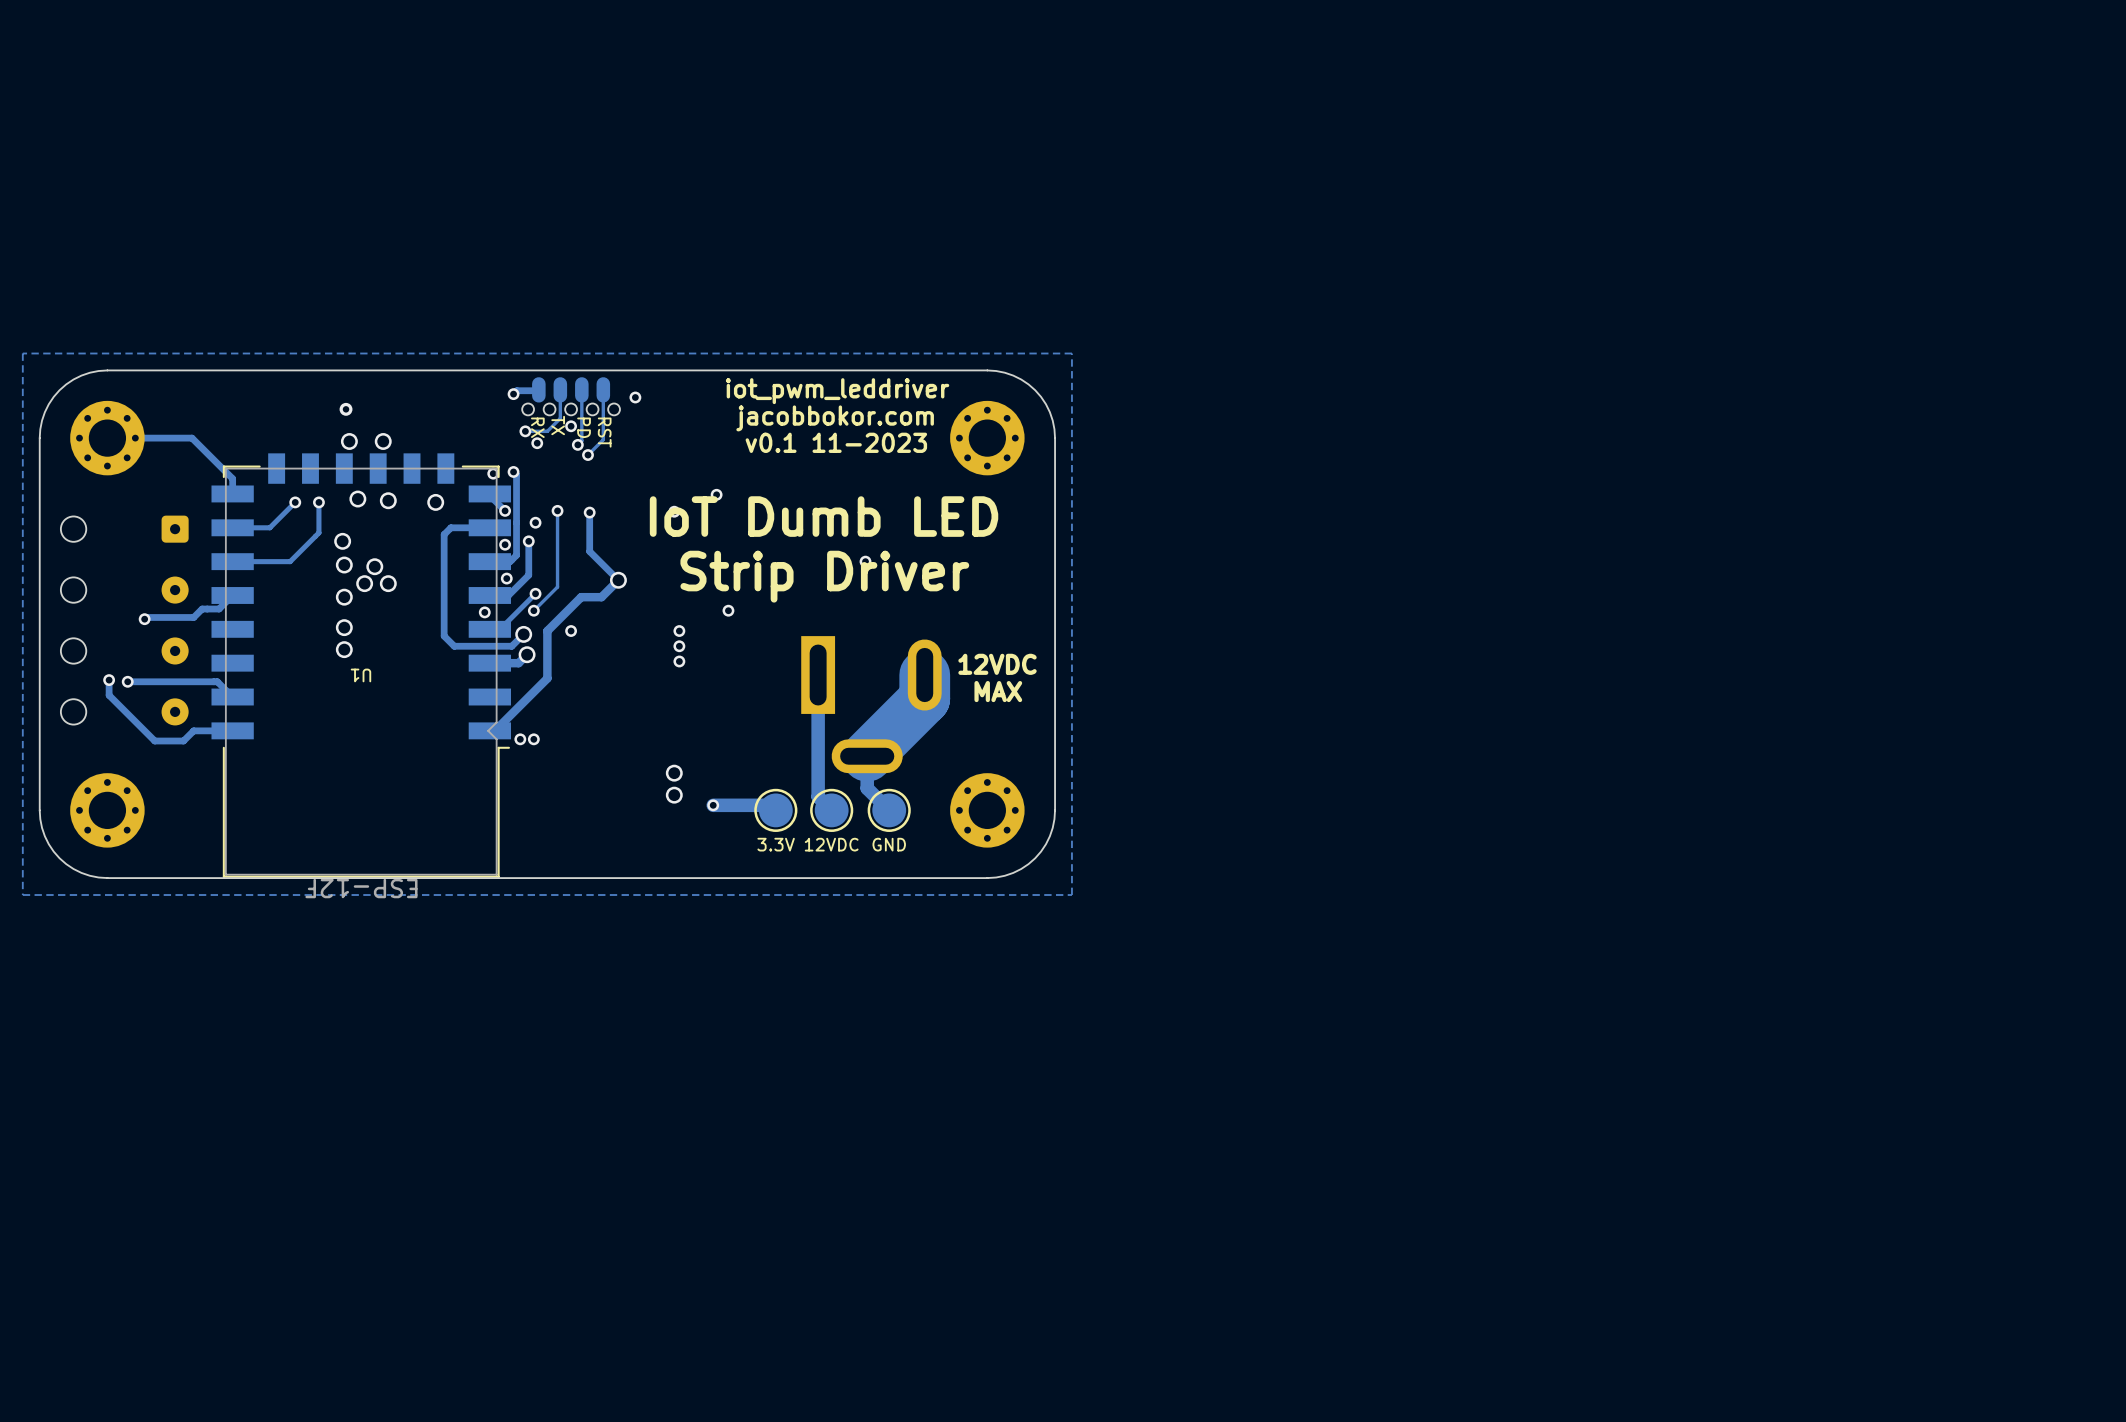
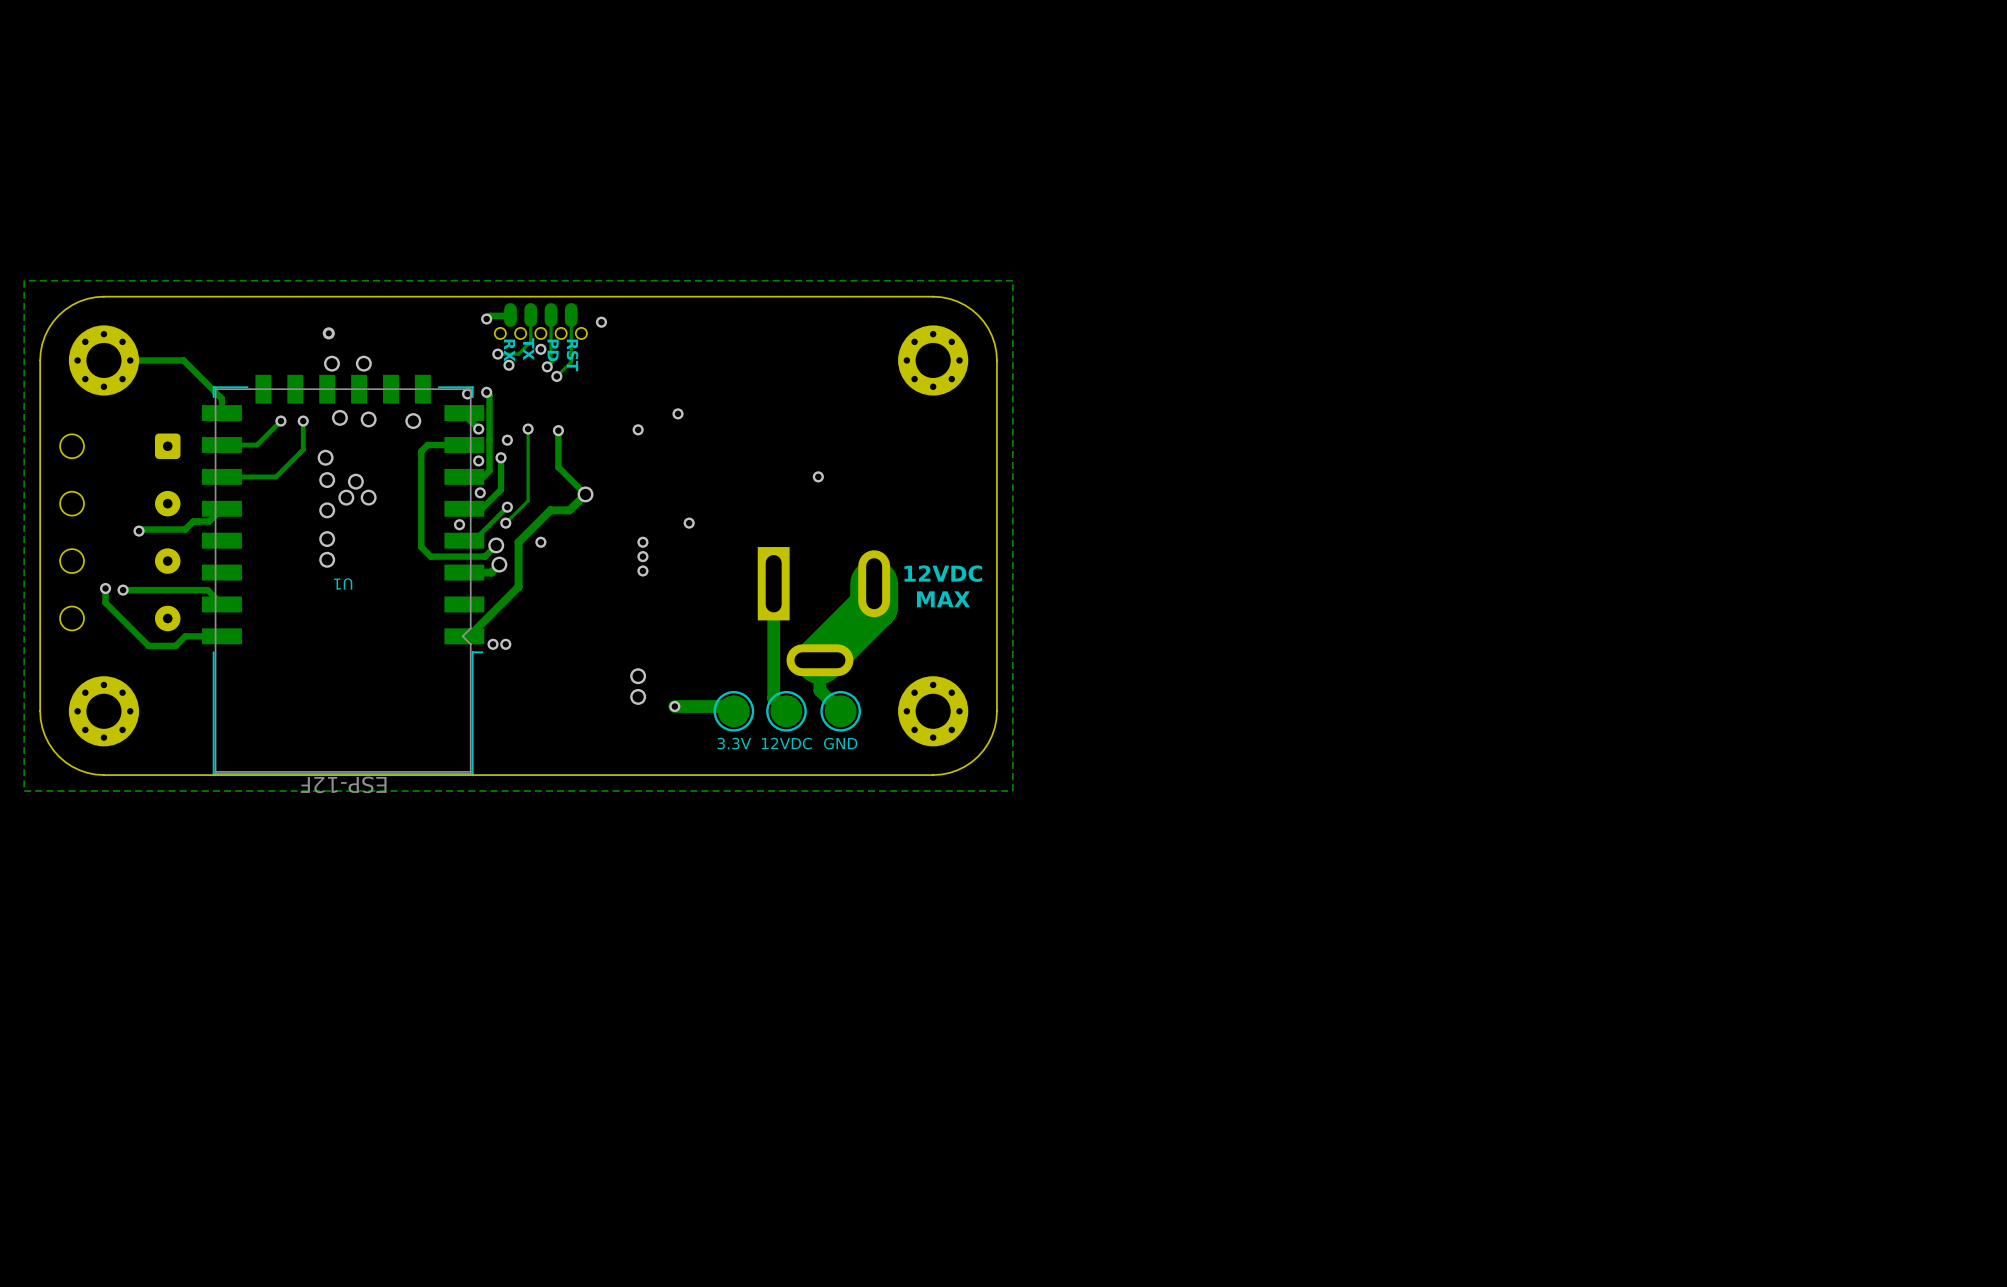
text: iot_pwm_leddriver (837, 391) -> none
text: jacobbokor.com (835, 418) -> none
text: v0.1 11-2023 (836, 442) -> none
text: IoT Dumb LED (824, 516) -> none
text: Strip Driver (824, 576) -> none

